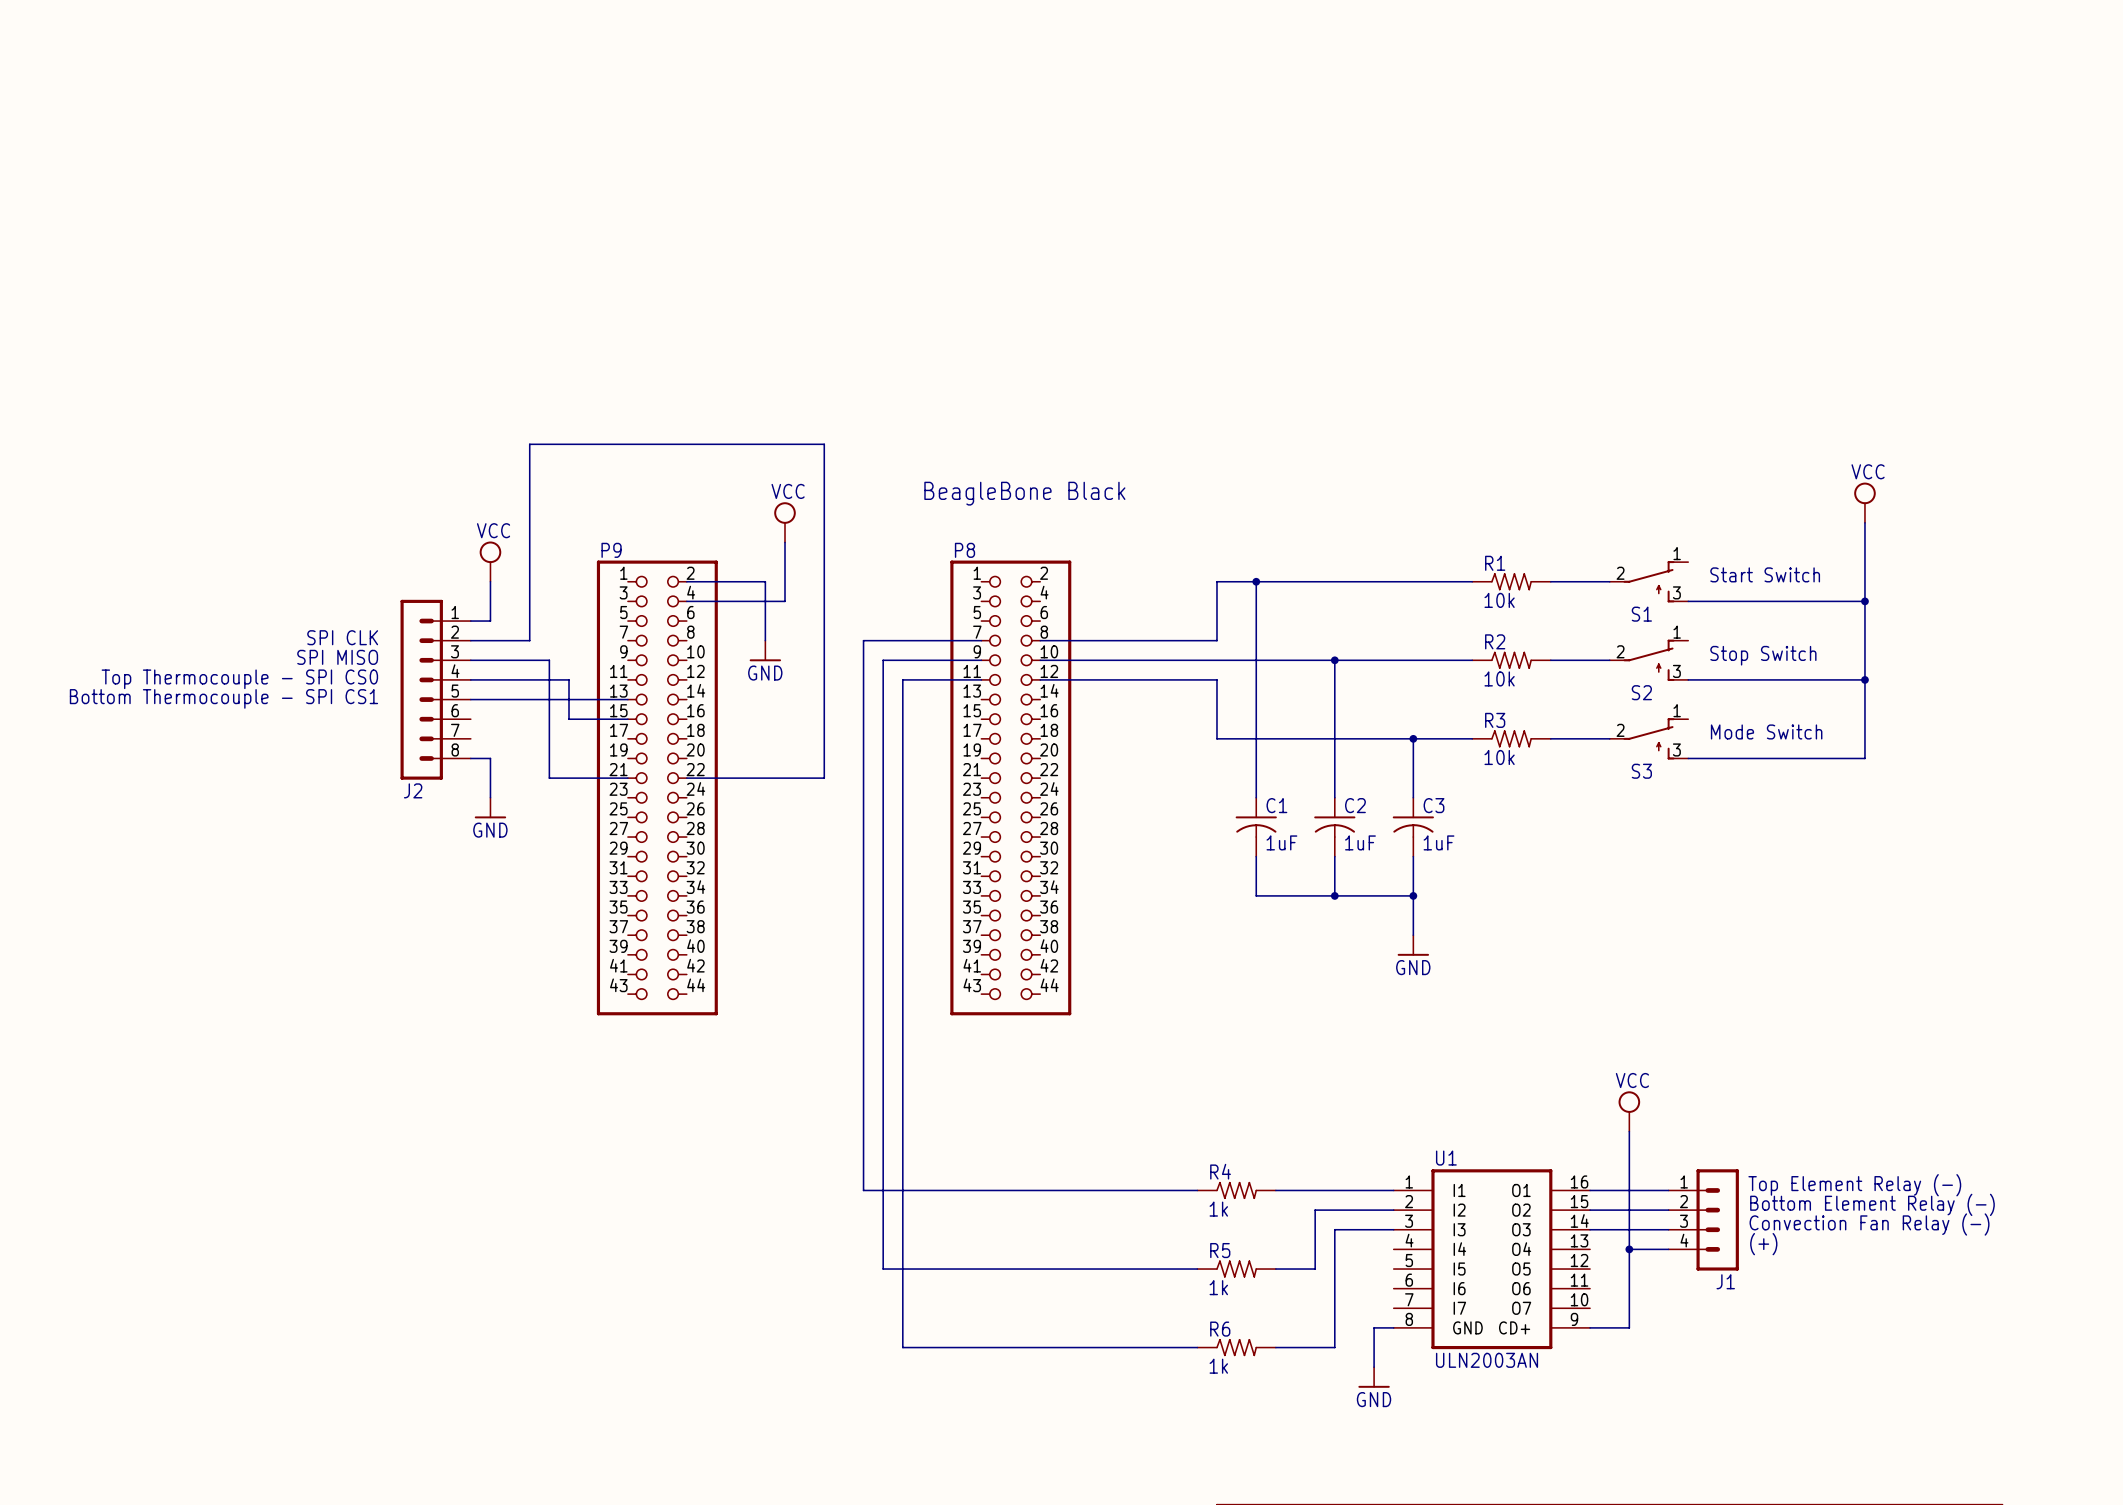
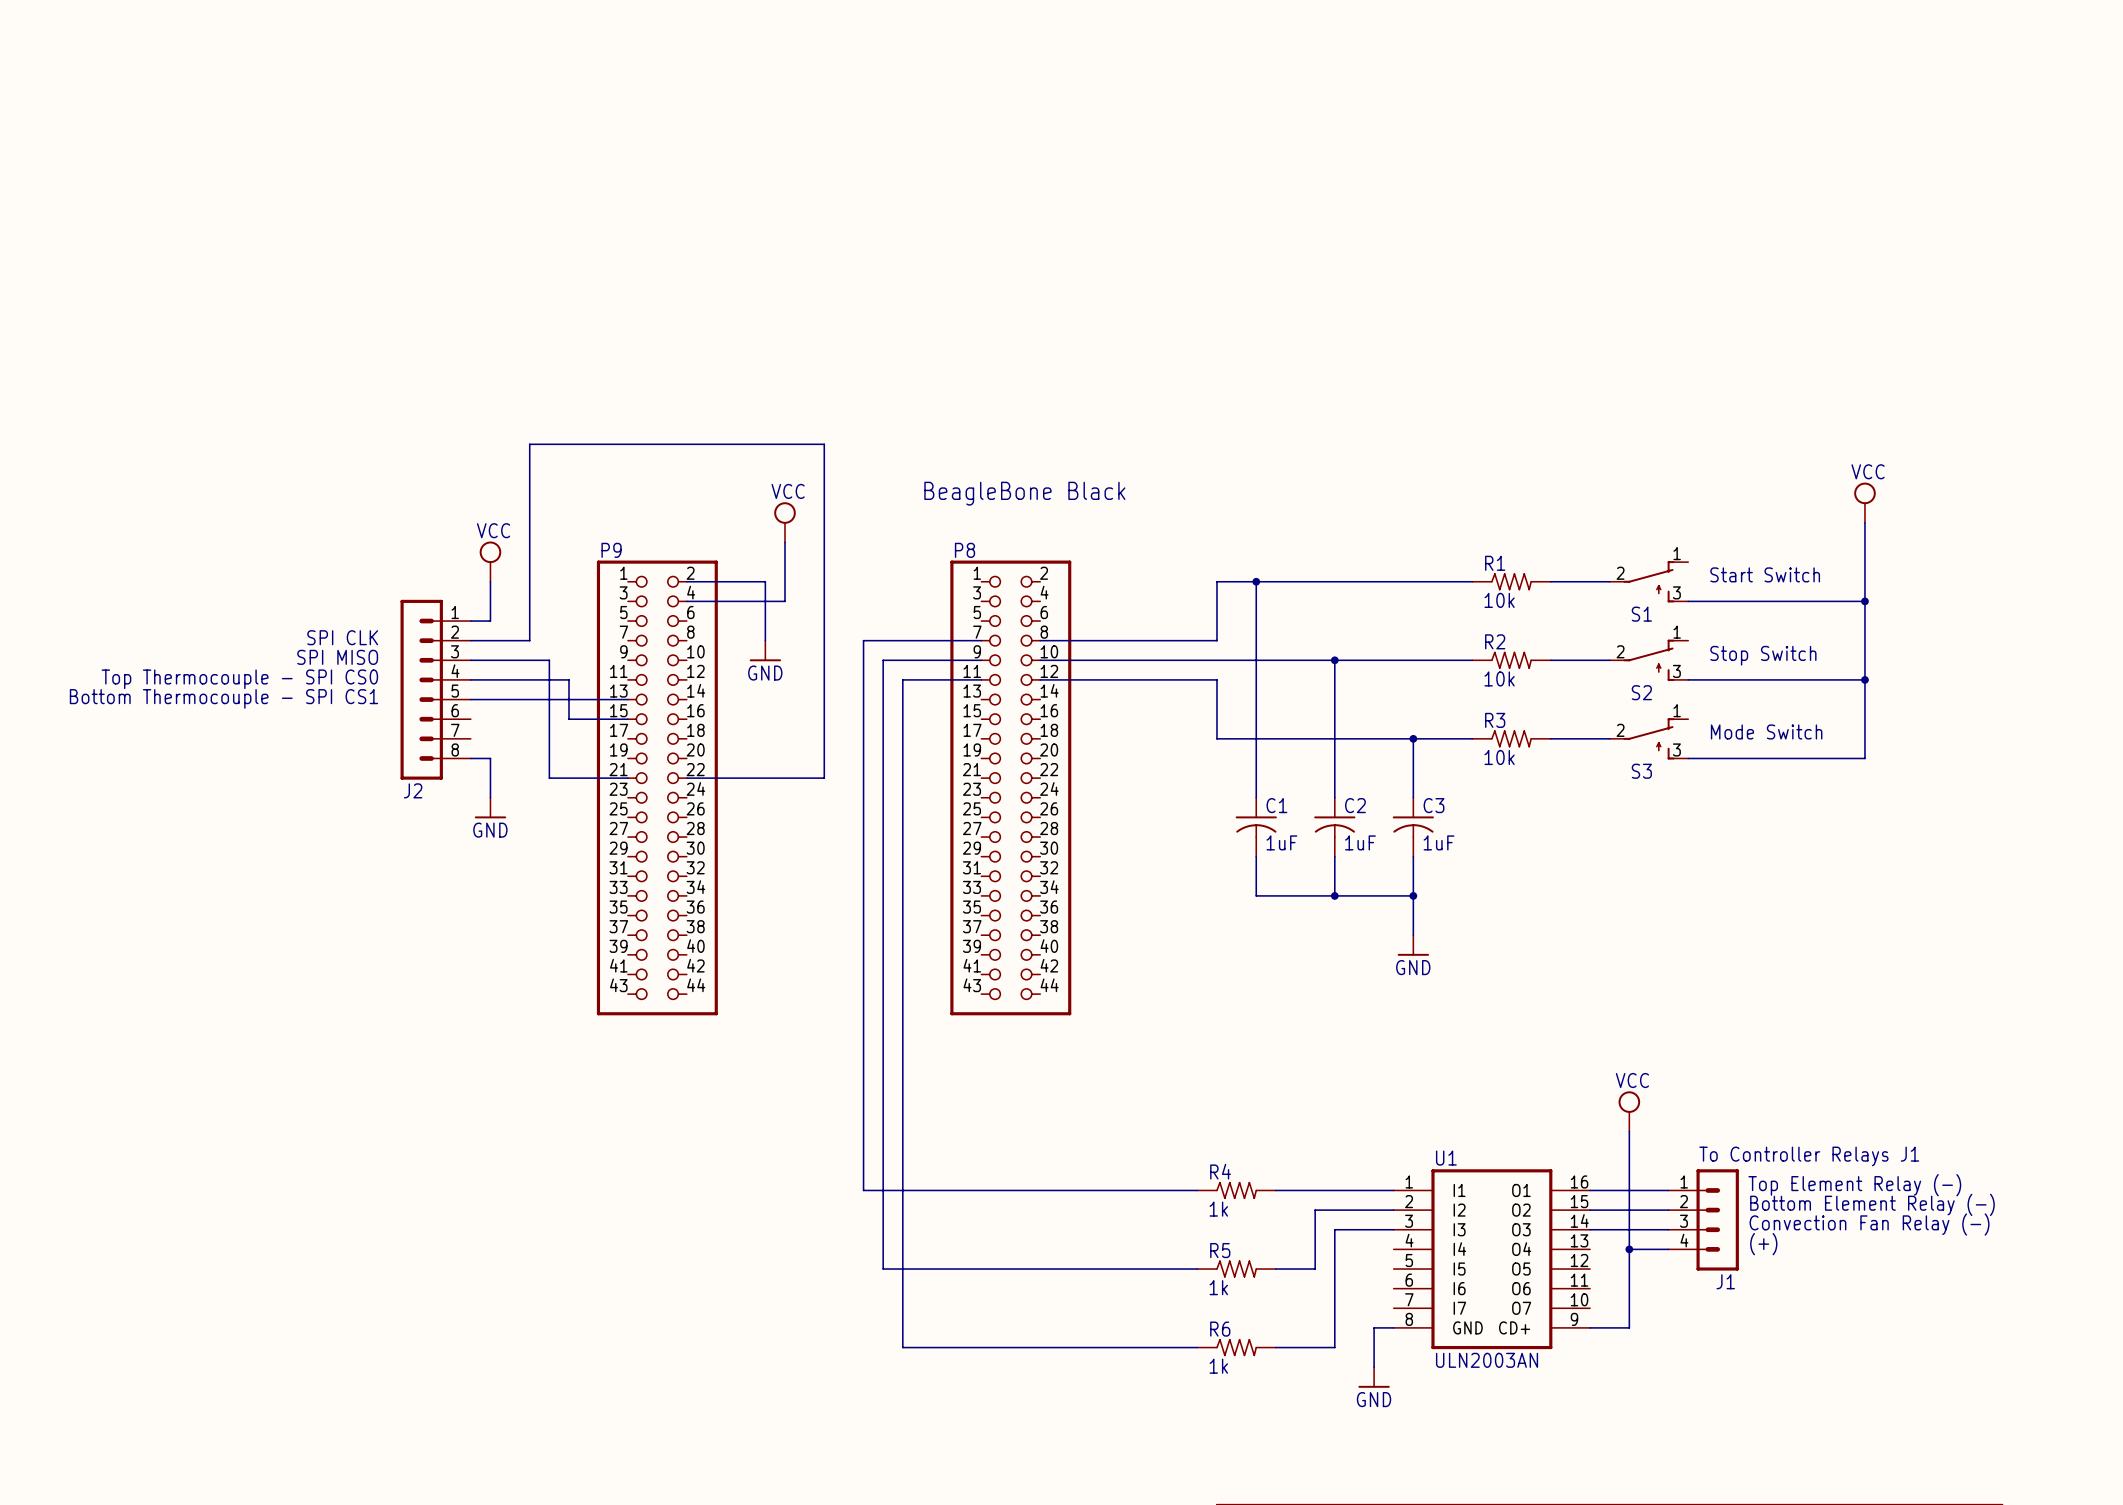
text: none -> To Controller Relays J1 (1809, 1156)

